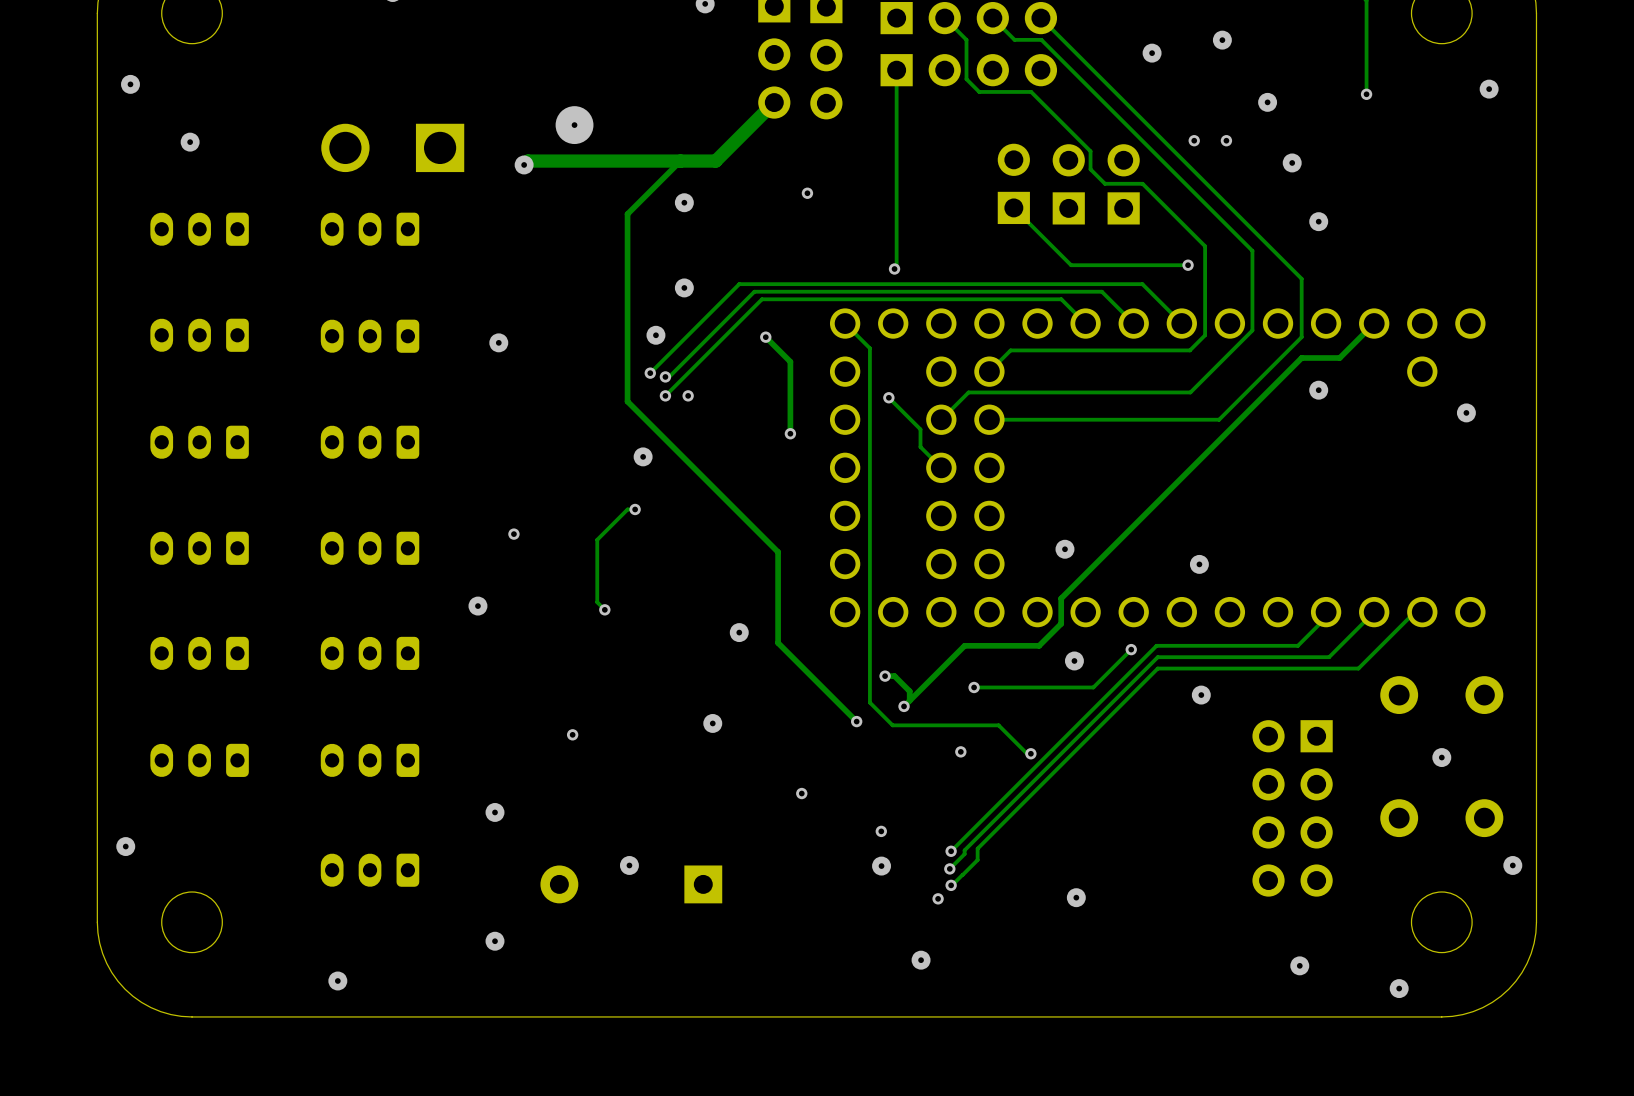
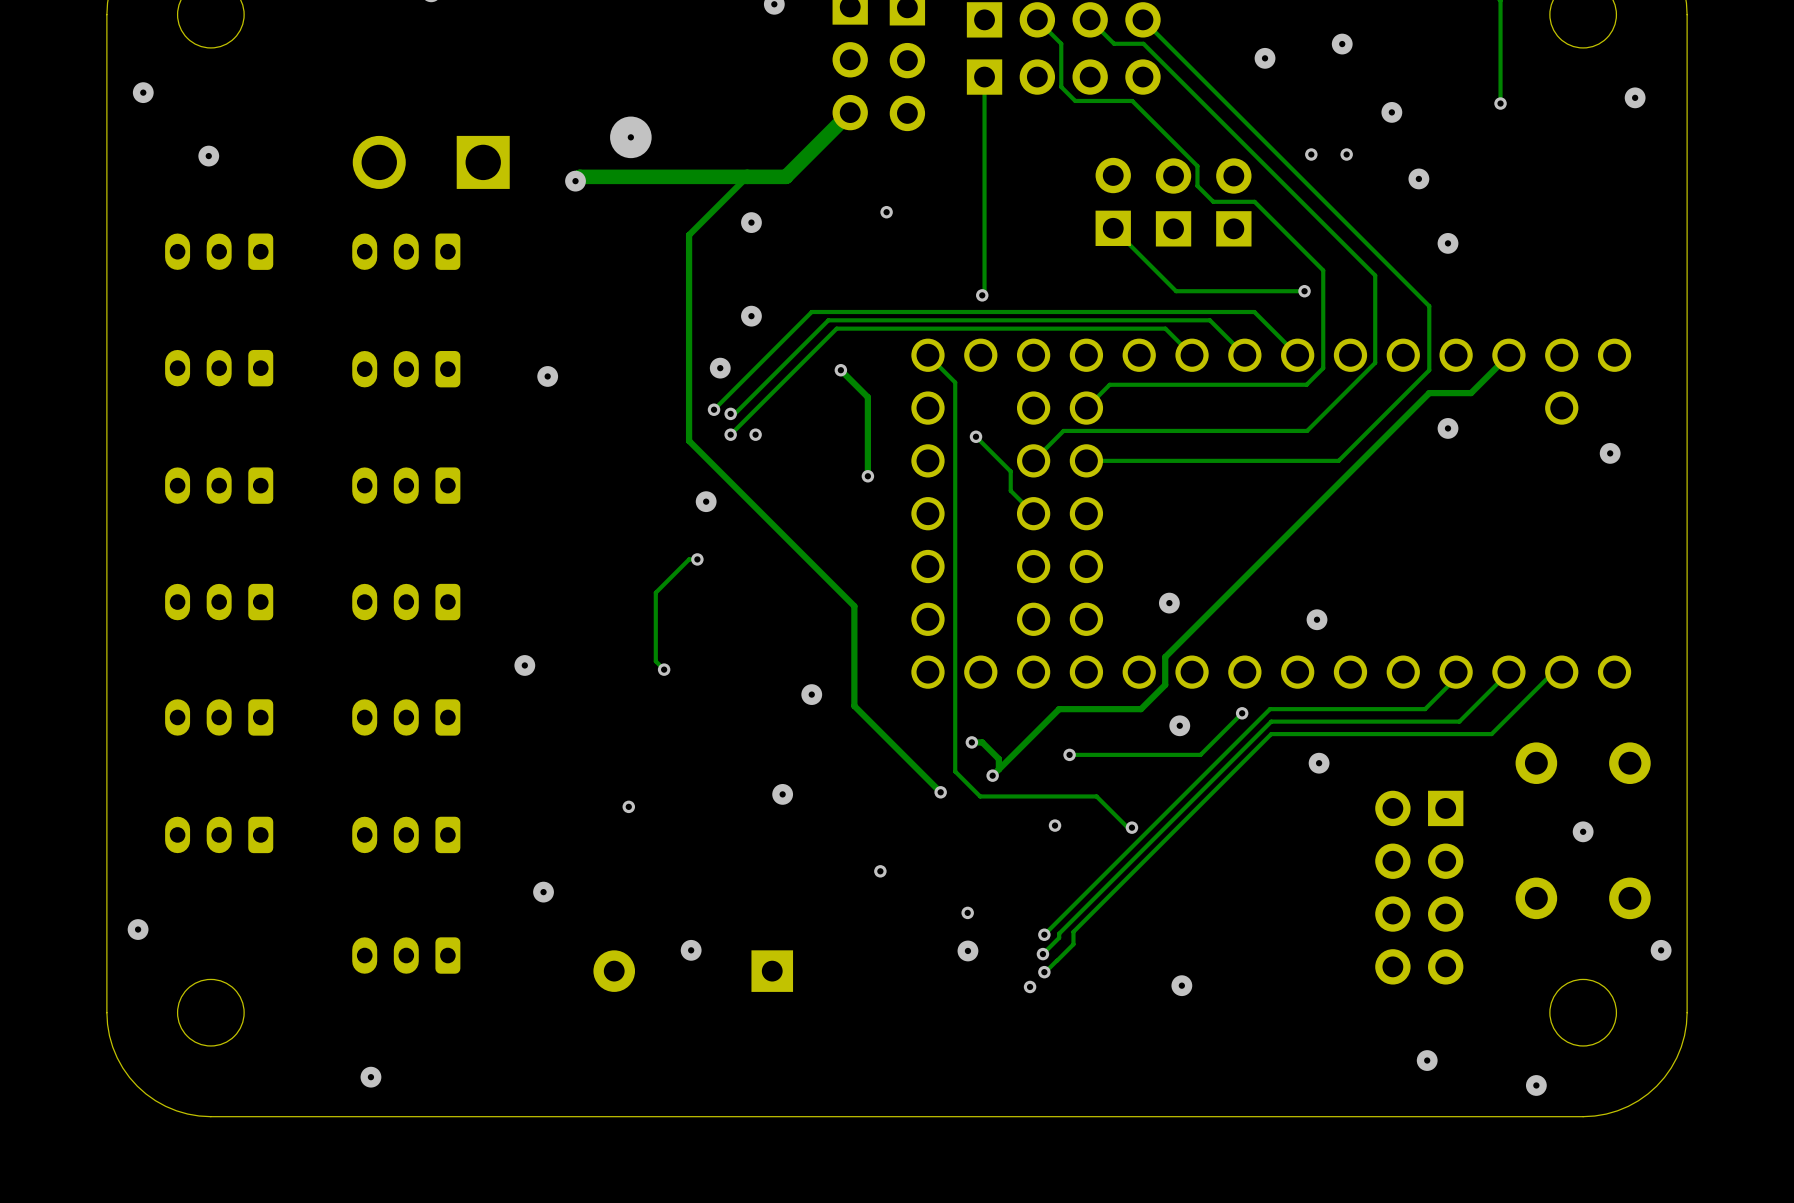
via: (513, 534) -> none
via: (495, 941) -> none
via: (921, 960) -> none

